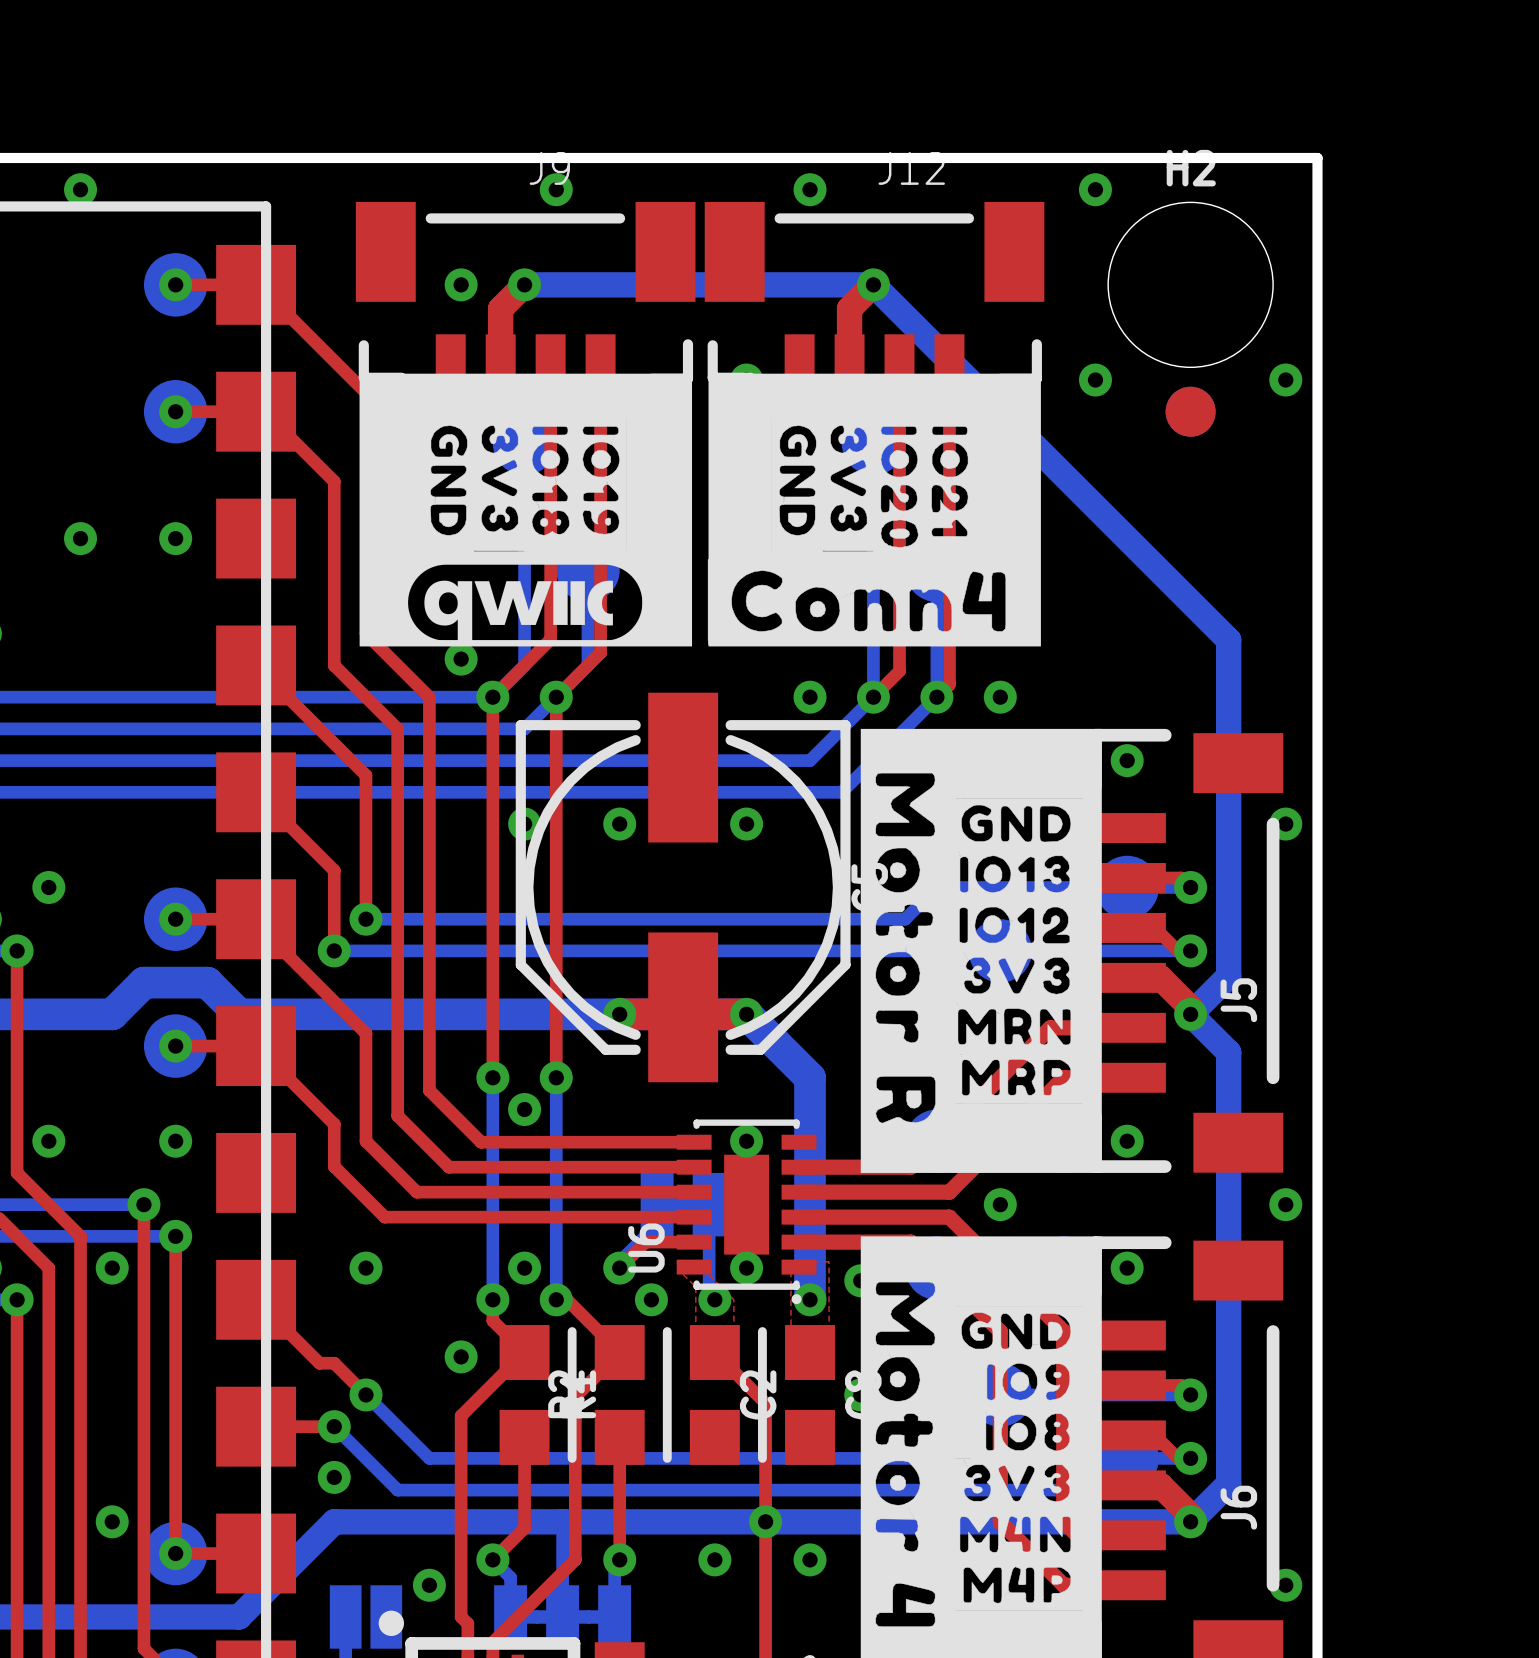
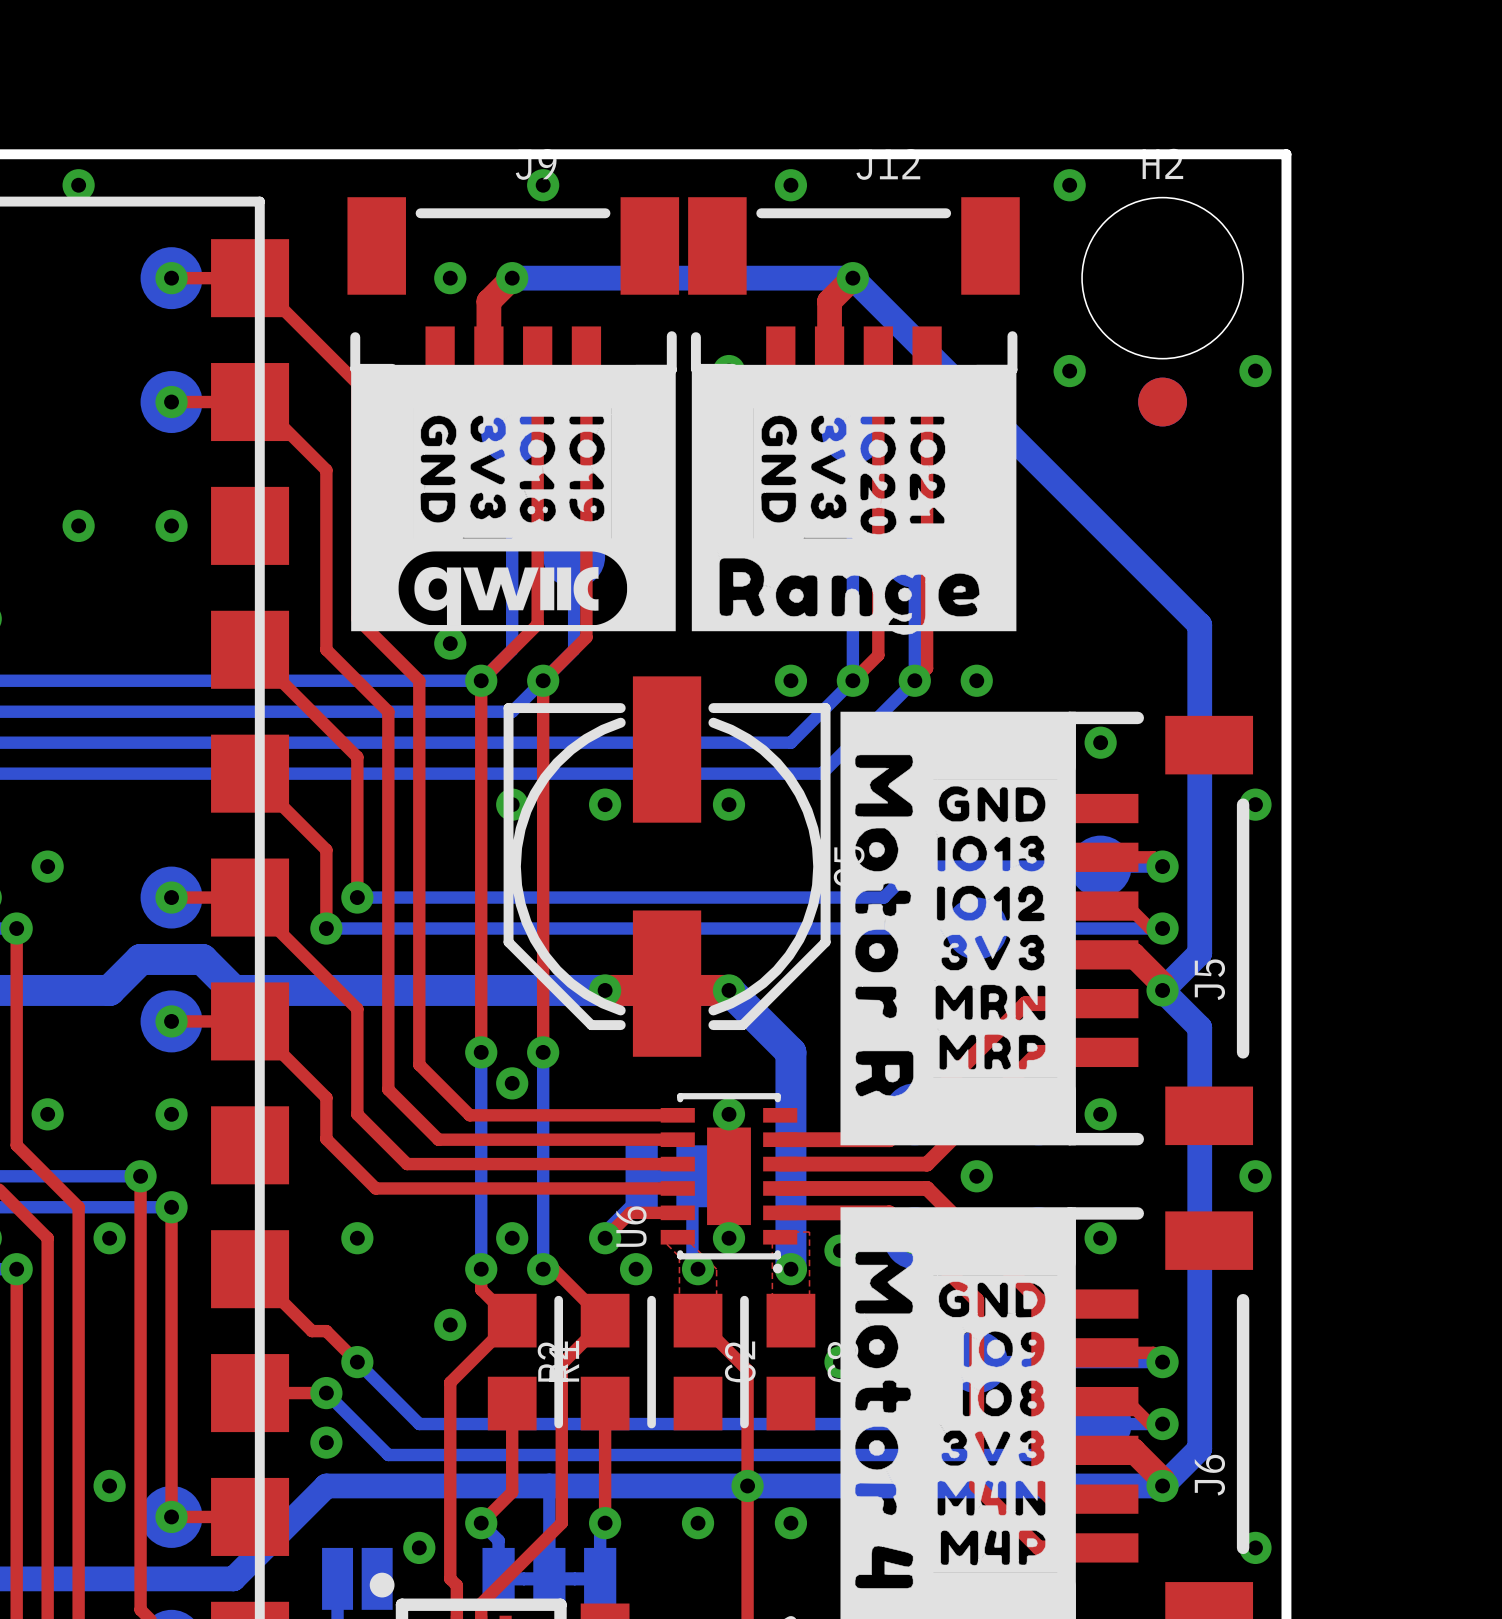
drawing shape: [707, 559, 1040, 645] -> [695, 546, 1011, 635]

